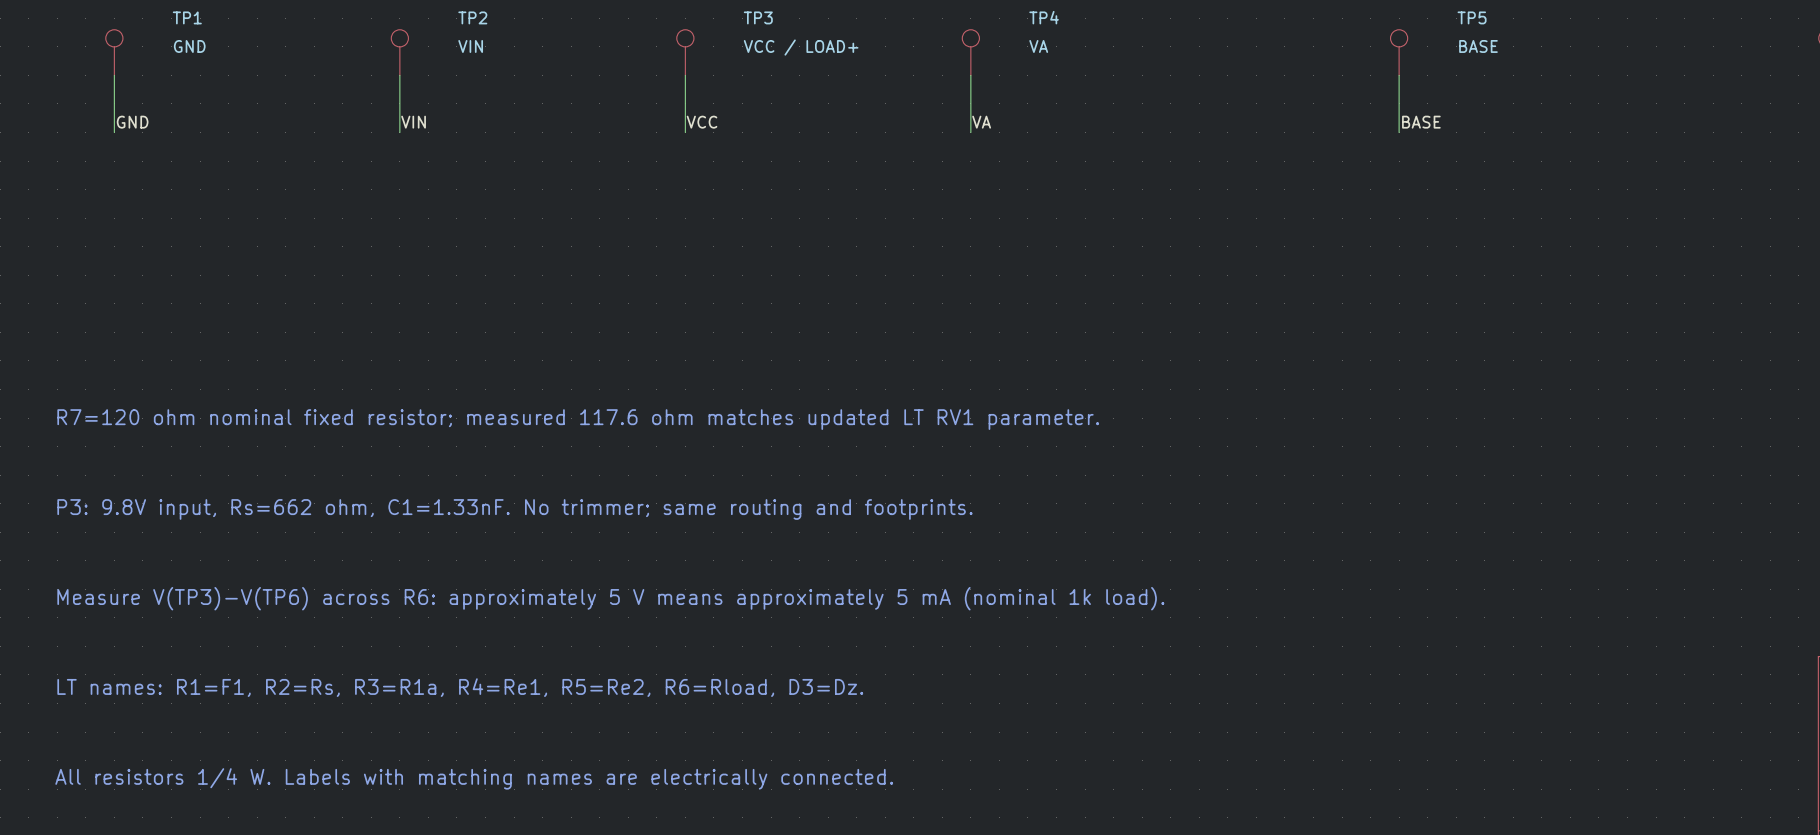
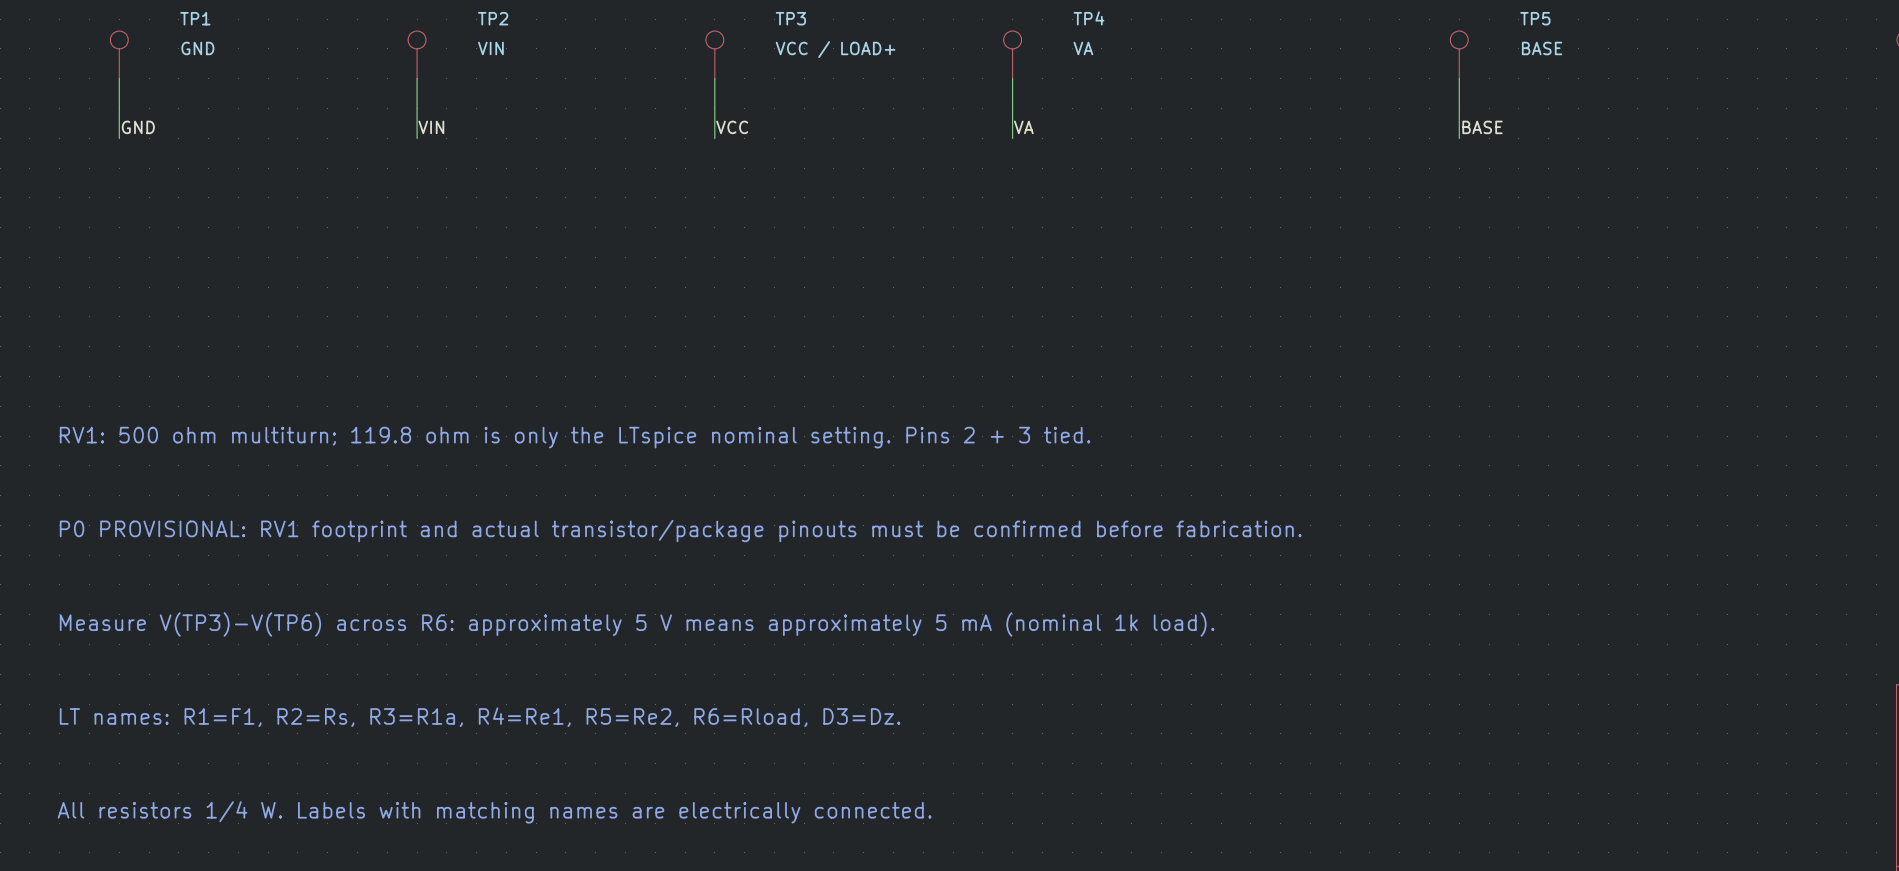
text: R7=120 ohm nominal fixed resistor; measured 117.6 ohm matches updated LT RV1 parameter. (578, 419) -> RV1: 500 ohm multiturn; 119.8 ohm is only the LTspice nominal setting. Pins 2 + 3 tied. (575, 437)
text: P3: 9.8V input, Rs=662 ohm, C1=1.33nF. No trimmer; same routing and footprints. (514, 509) -> P0 PROVISIONAL: RV1 footprint and actual transistor/package pinouts must be confirmed before fabrication. (680, 531)

